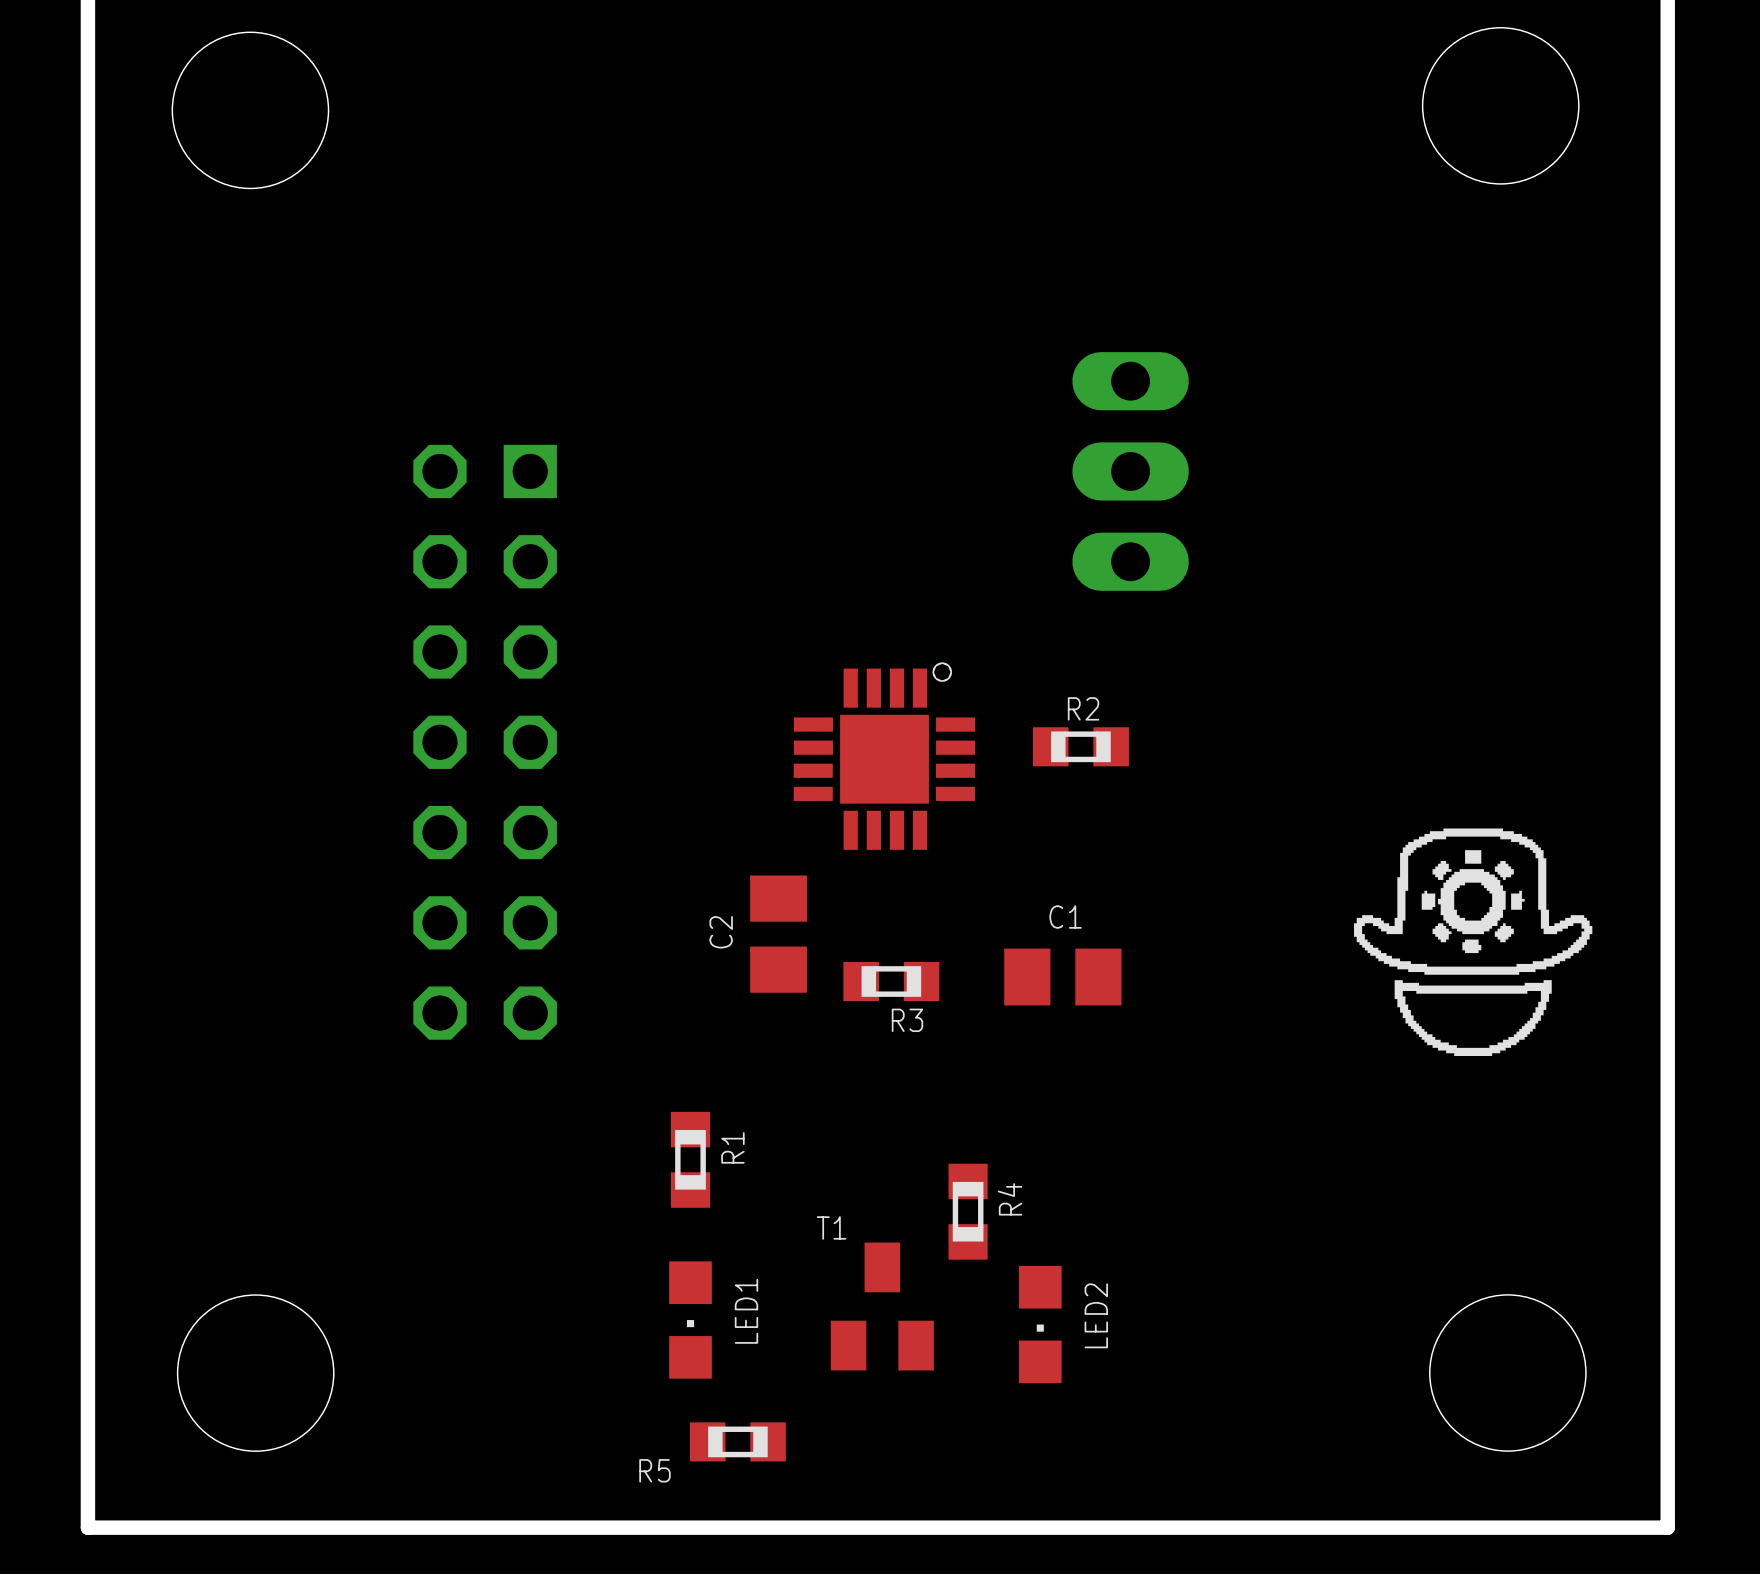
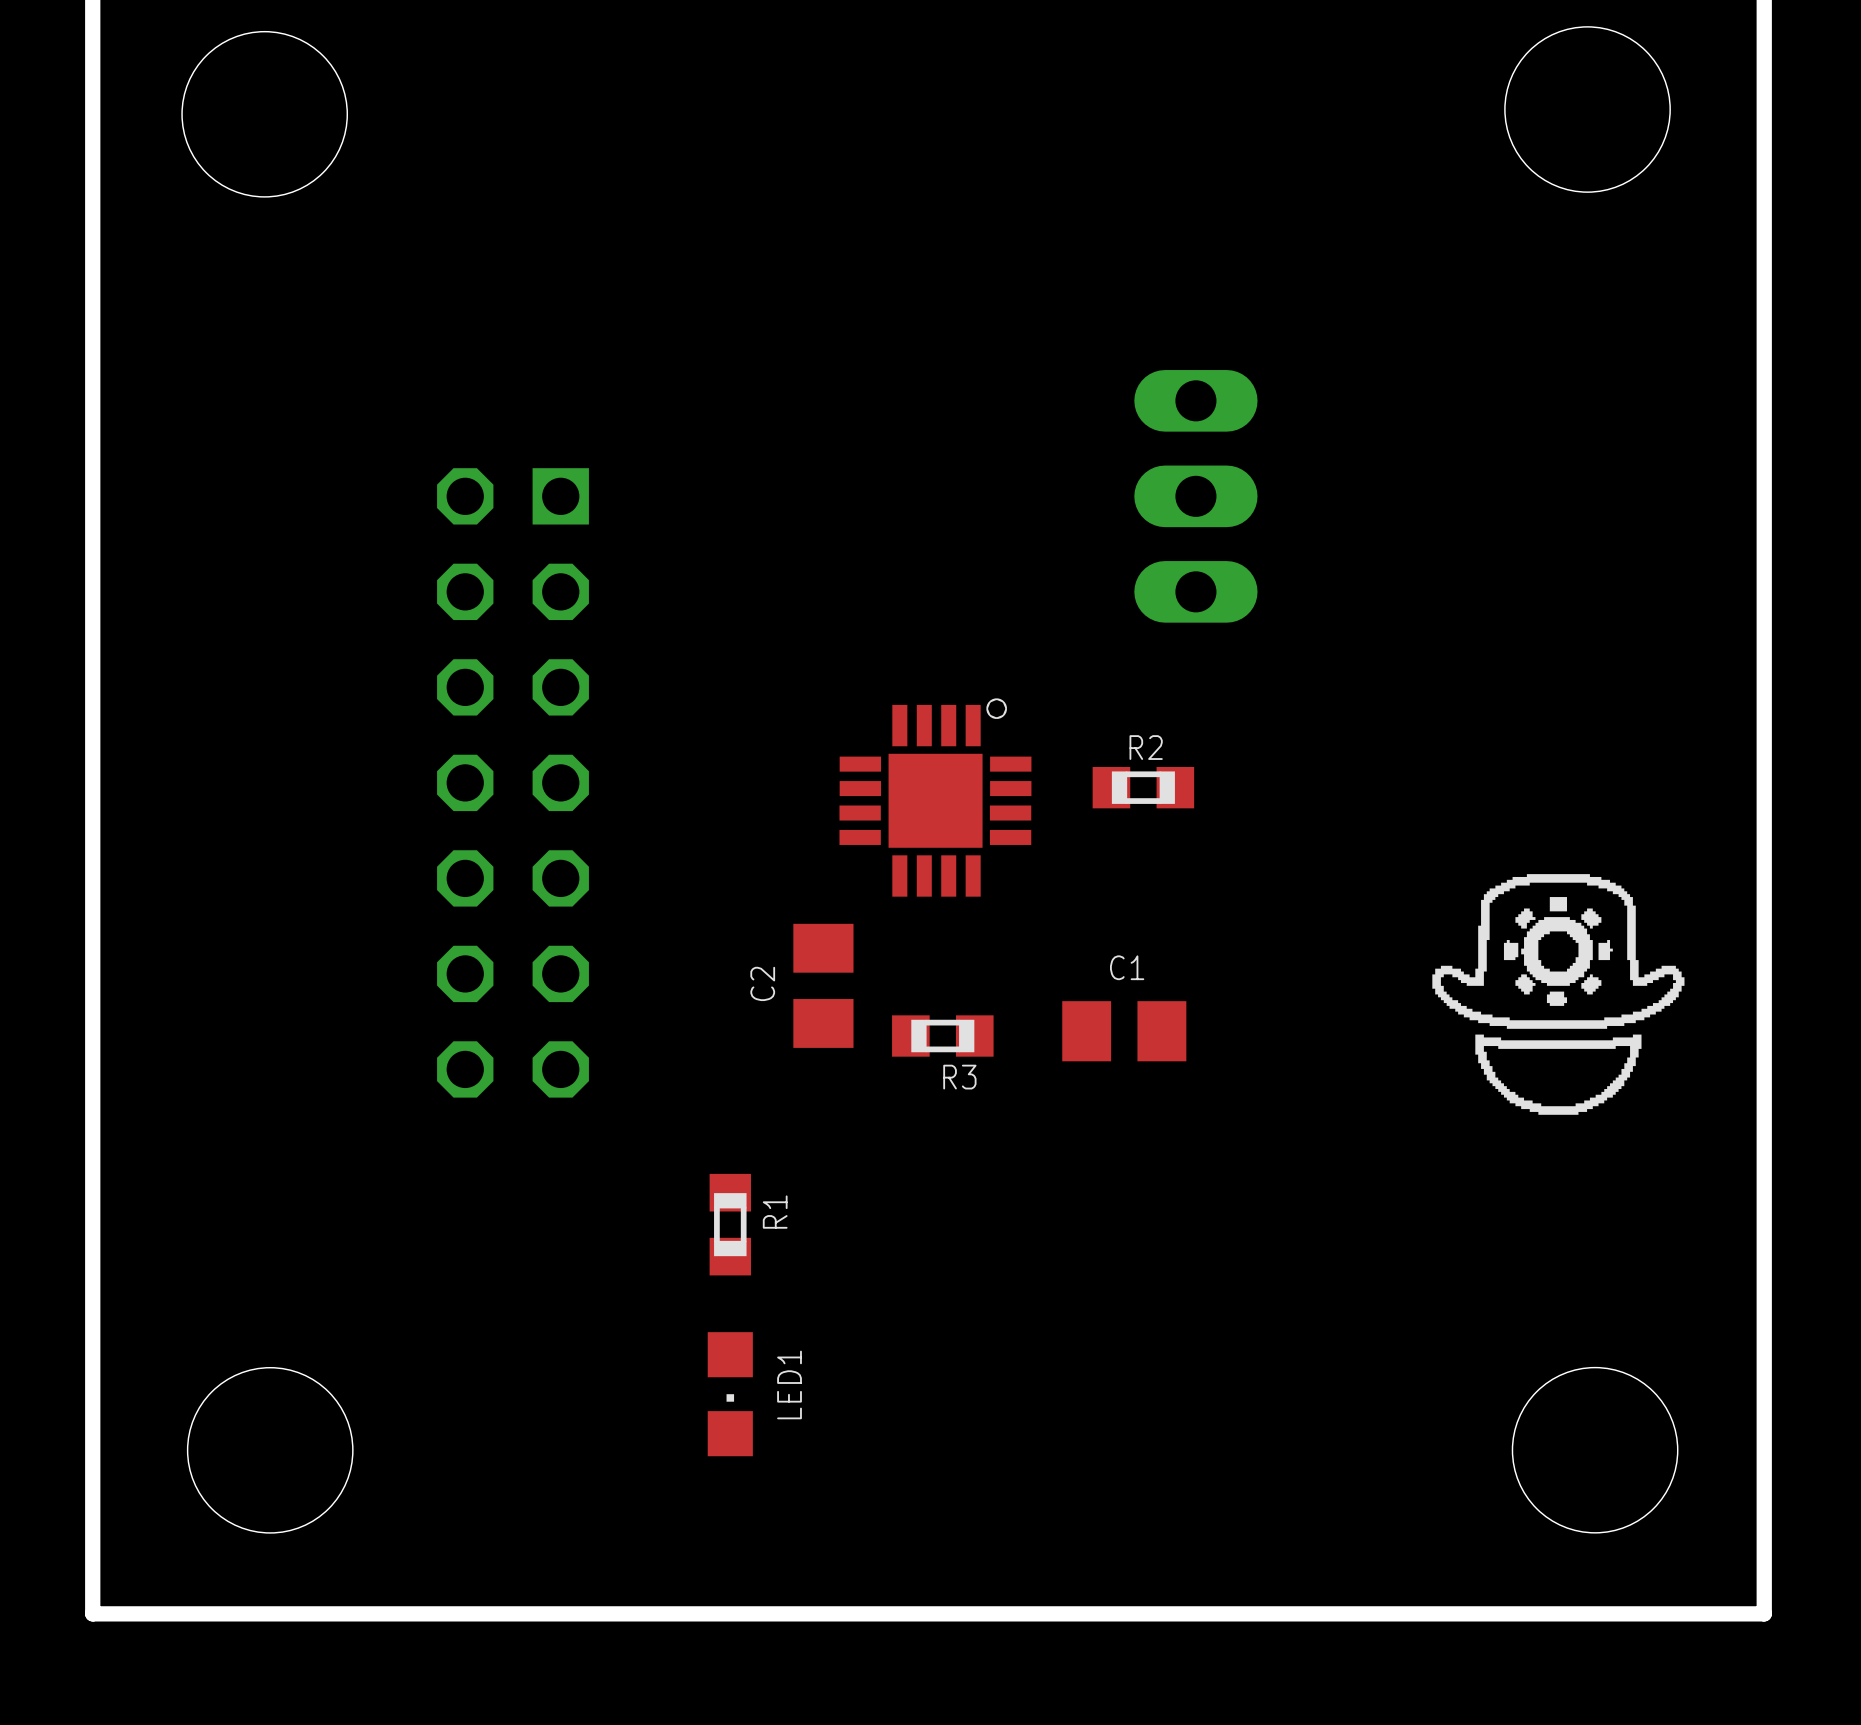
R4: (968, 1211) -> none
T1: (882, 1306) -> none
LED2: (1040, 1324) -> none
R5: (737, 1441) -> none

